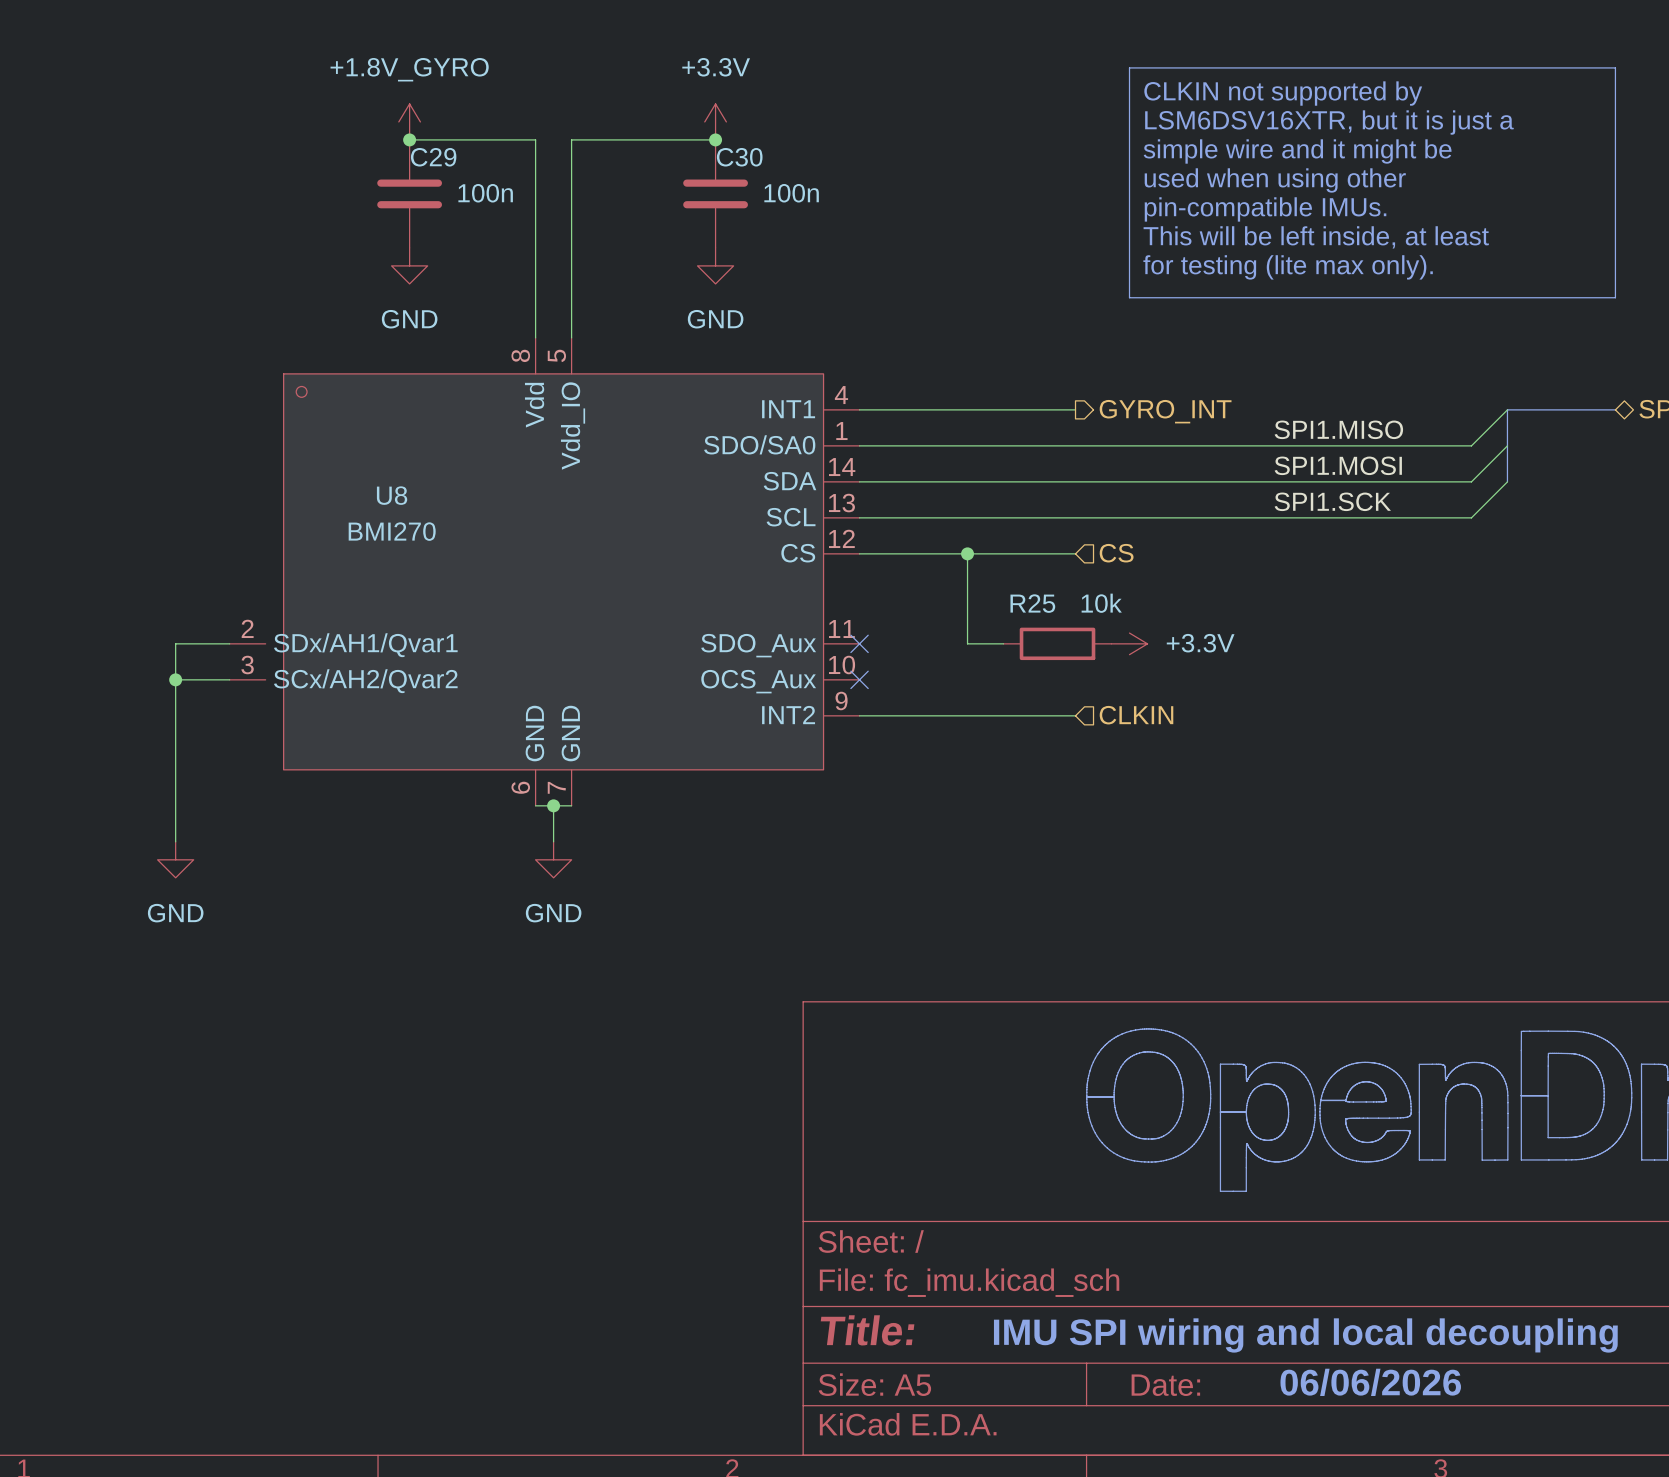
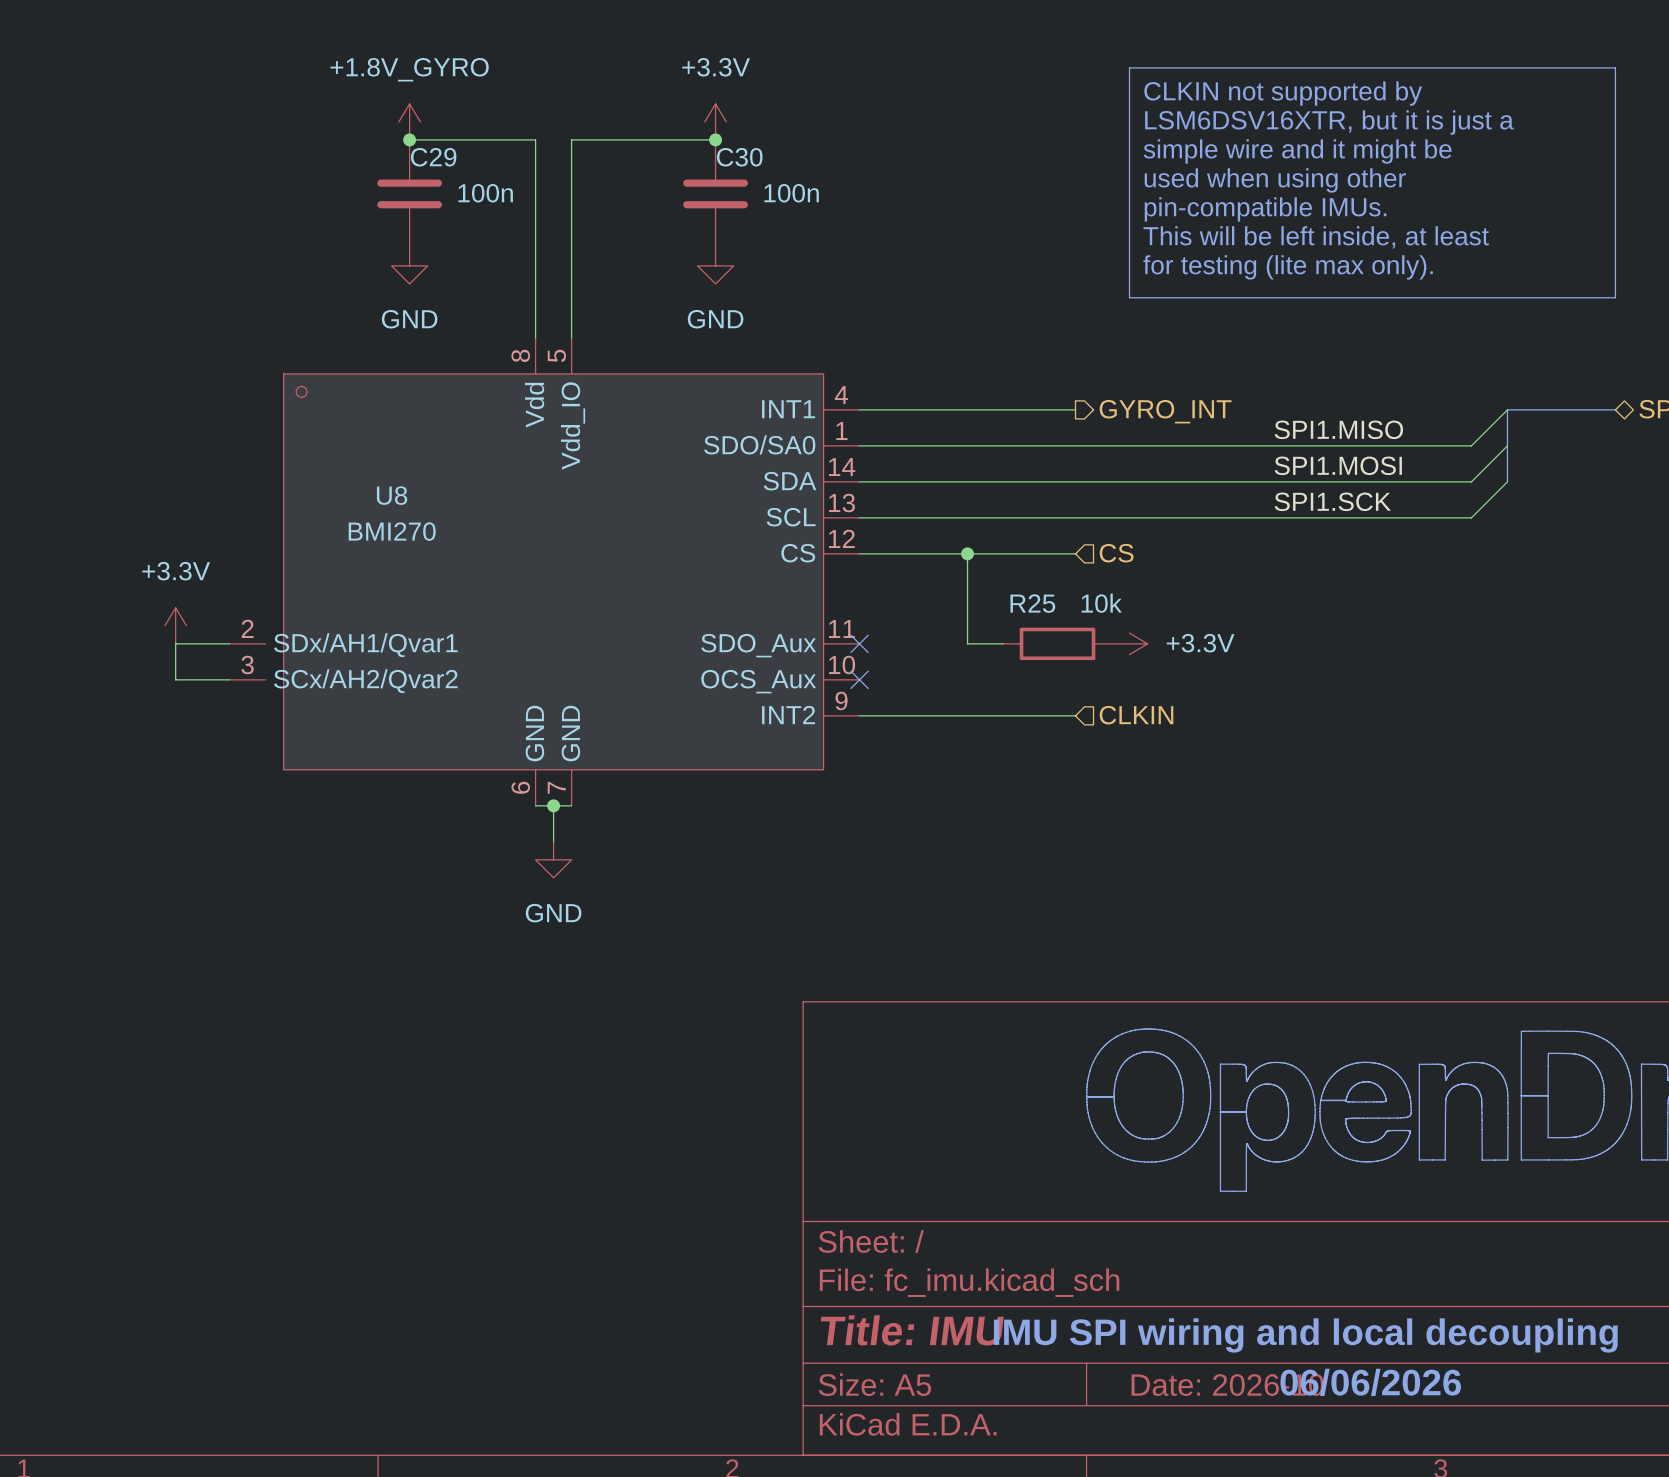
power symbol: none -> +3.3V (175, 625)
wire: (175, 679) (175, 841) -> none
junction: (175, 679) -> none
power symbol: GND (175, 859) -> none
title block: Title: (867, 1330) -> Title: IMU (912, 1330)
title block: Date: (1165, 1385) -> Date: 2026-10 (1227, 1385)

